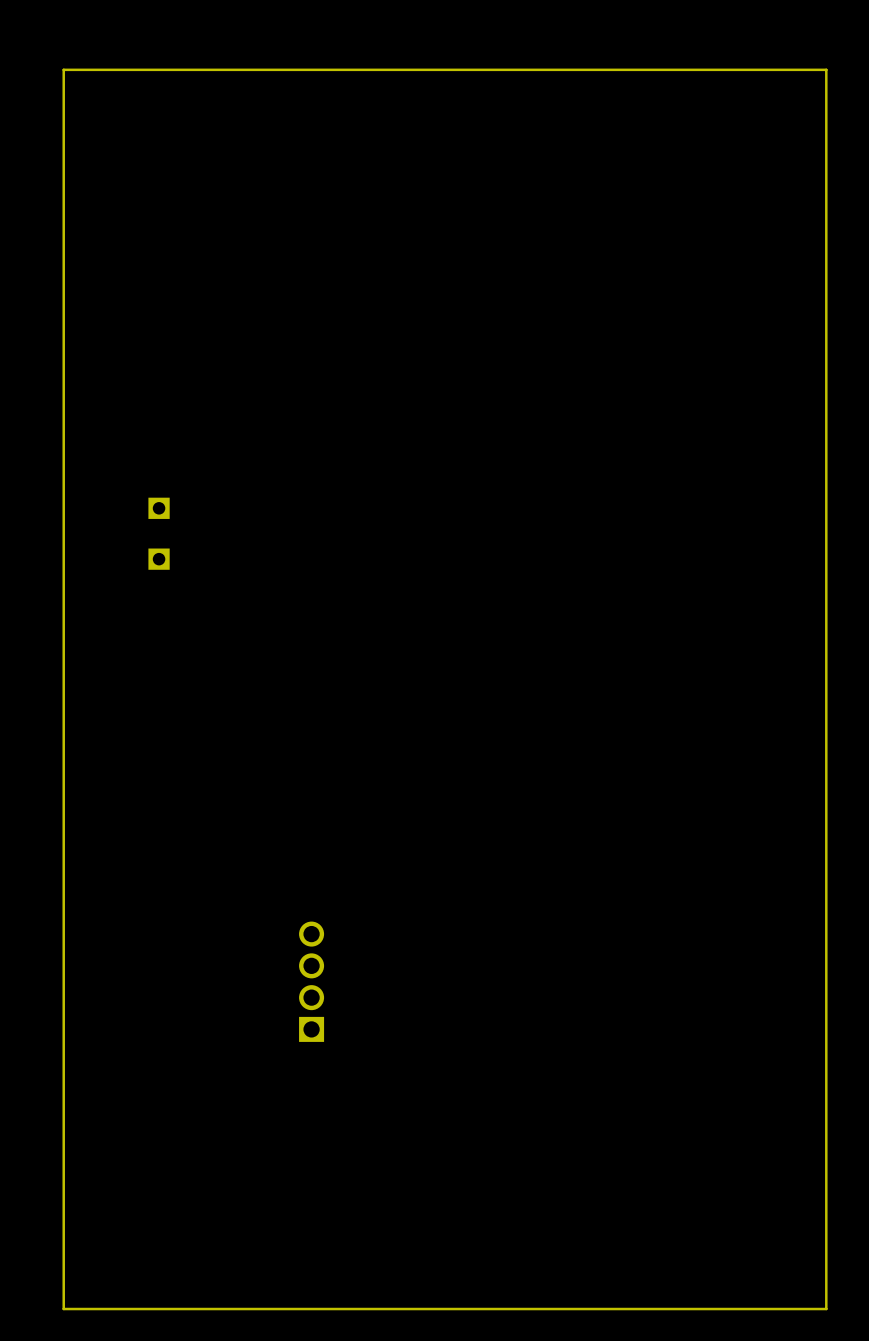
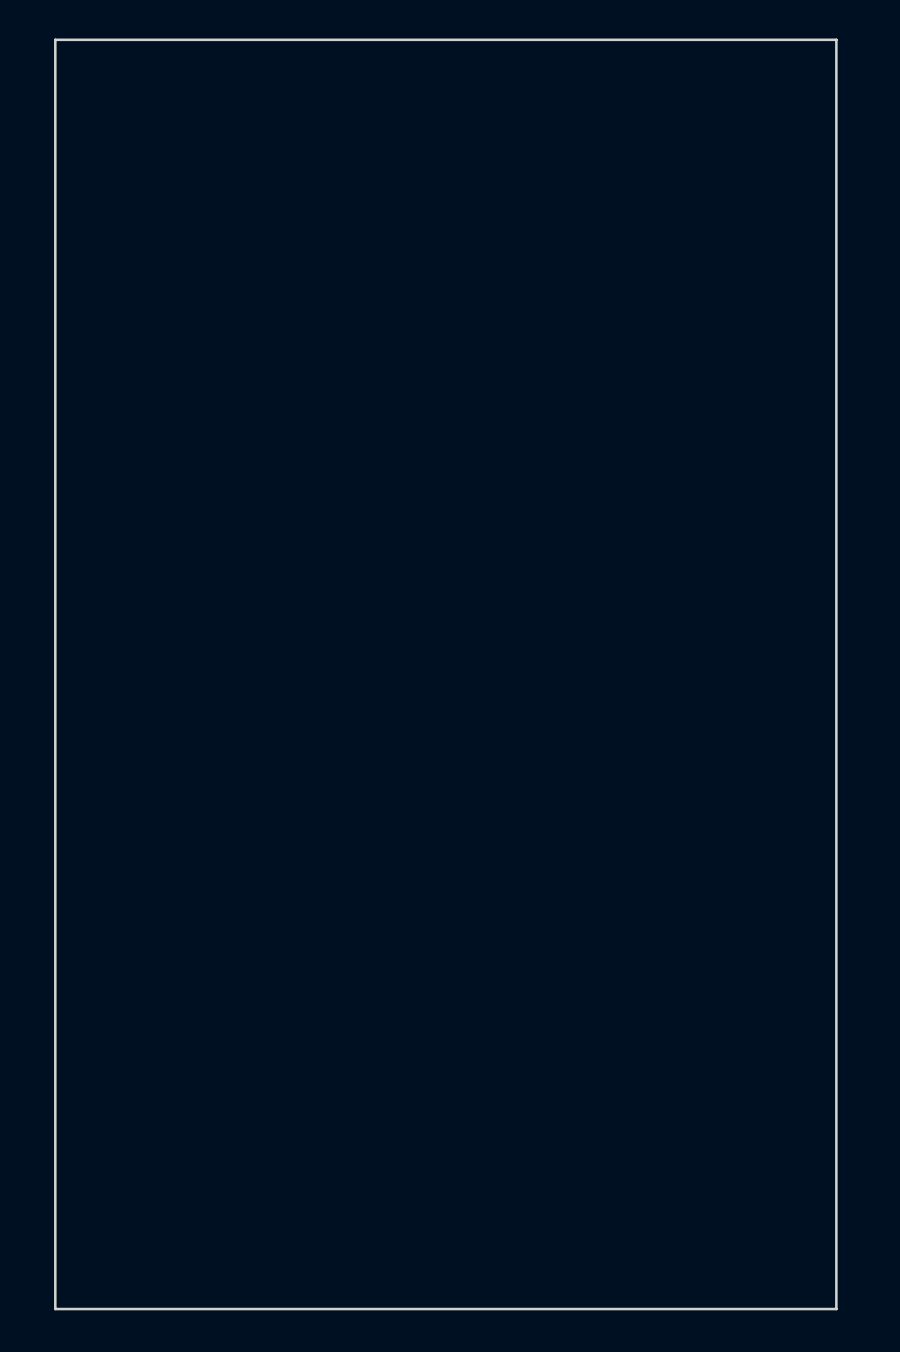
part: (159, 508) -> none
part: (159, 559) -> none
part: (311, 981) -> none

